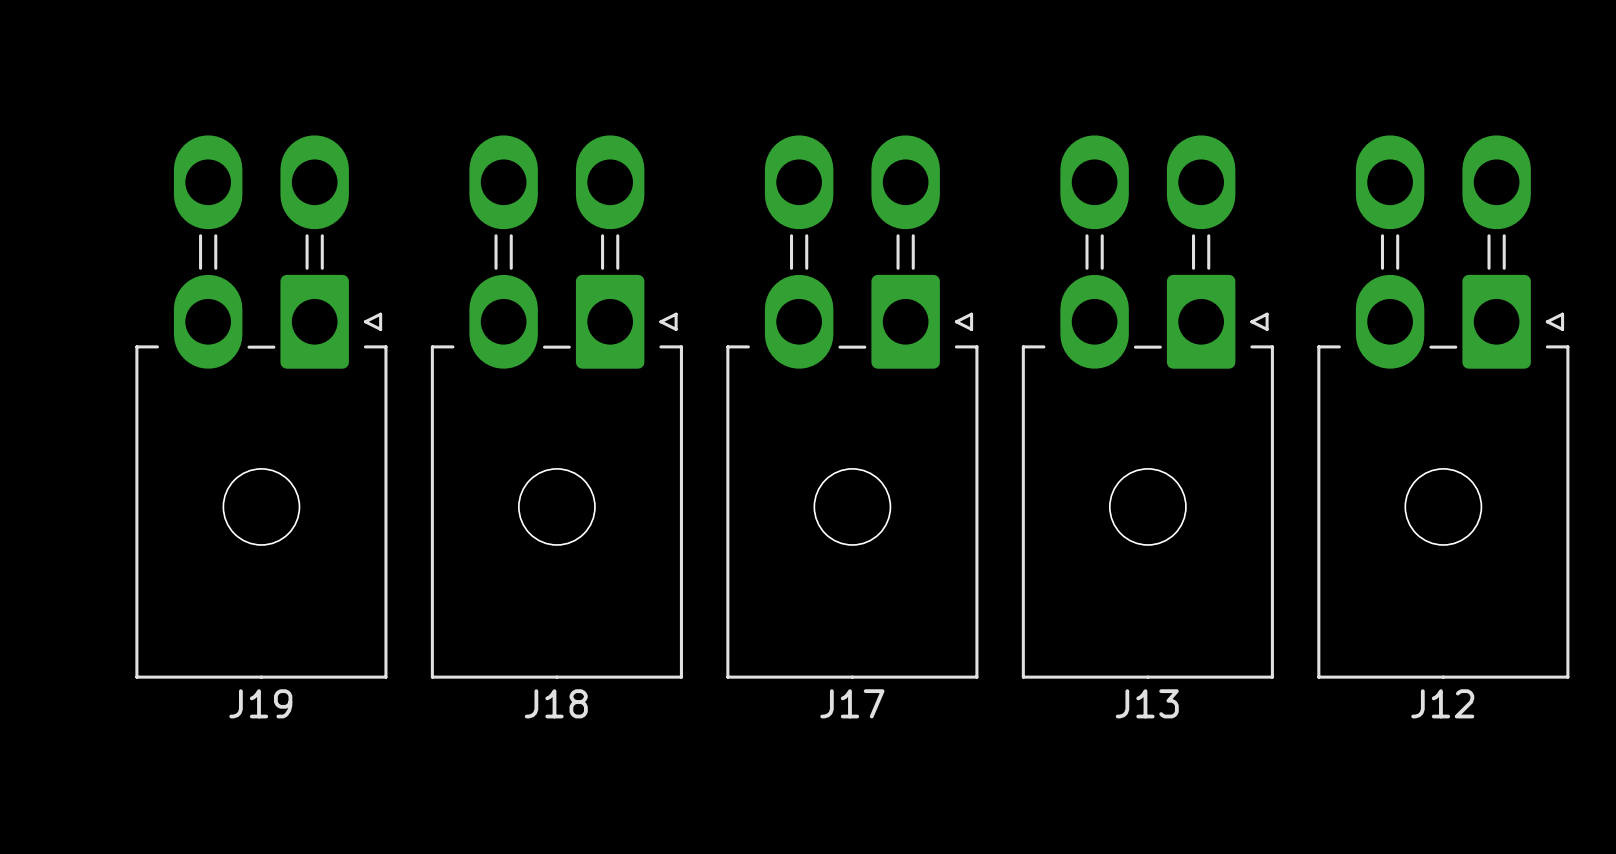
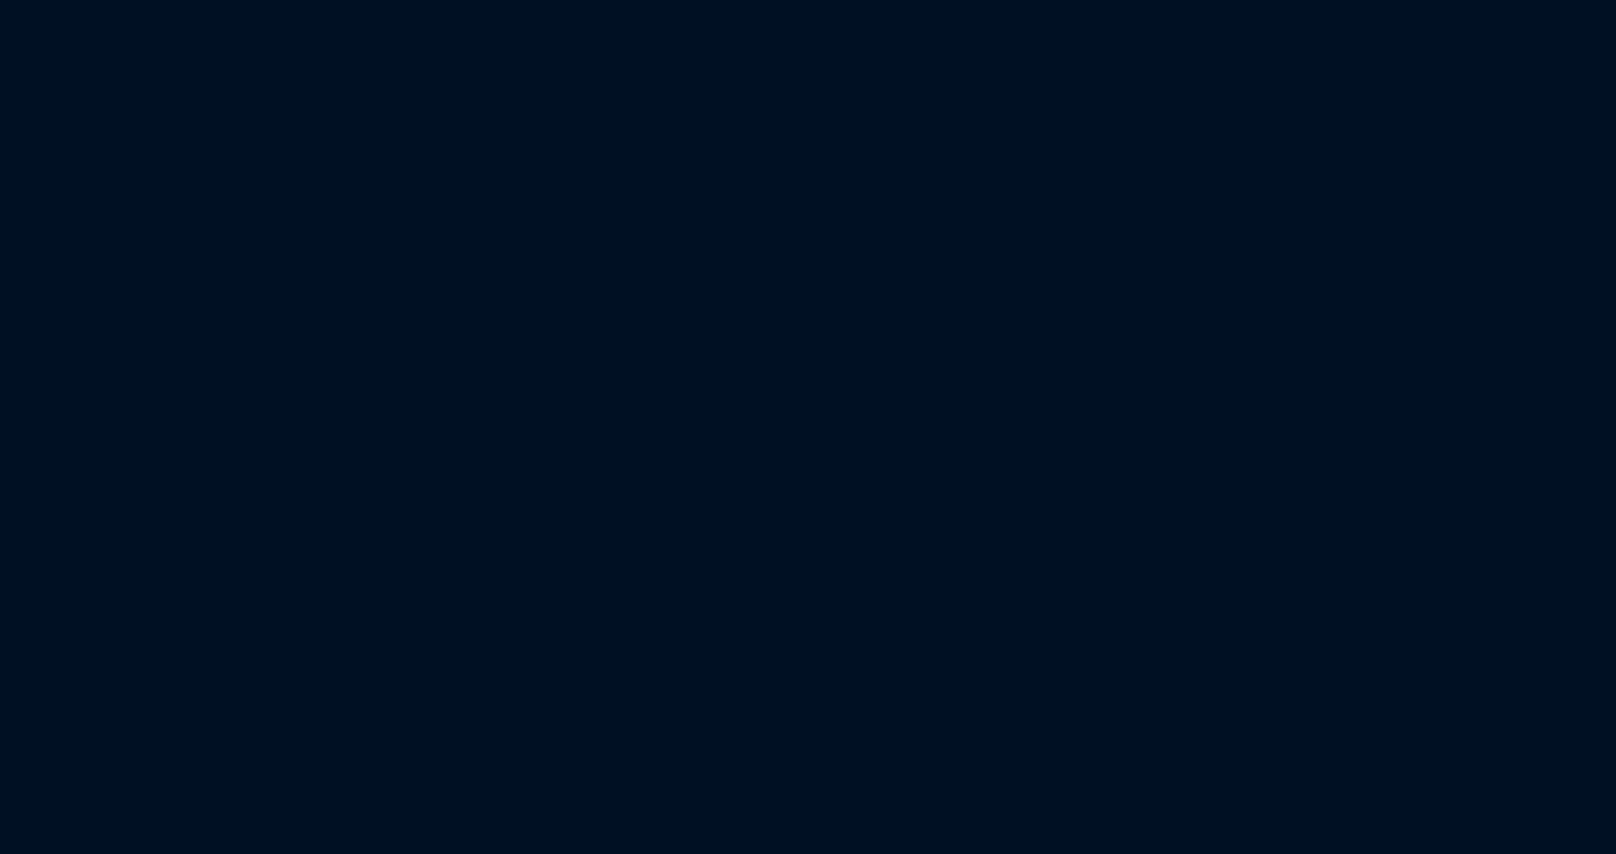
J19: (261, 407) -> none
J18: (556, 407) -> none
J17: (852, 407) -> none
J13: (1147, 407) -> none
J12: (1443, 407) -> none

